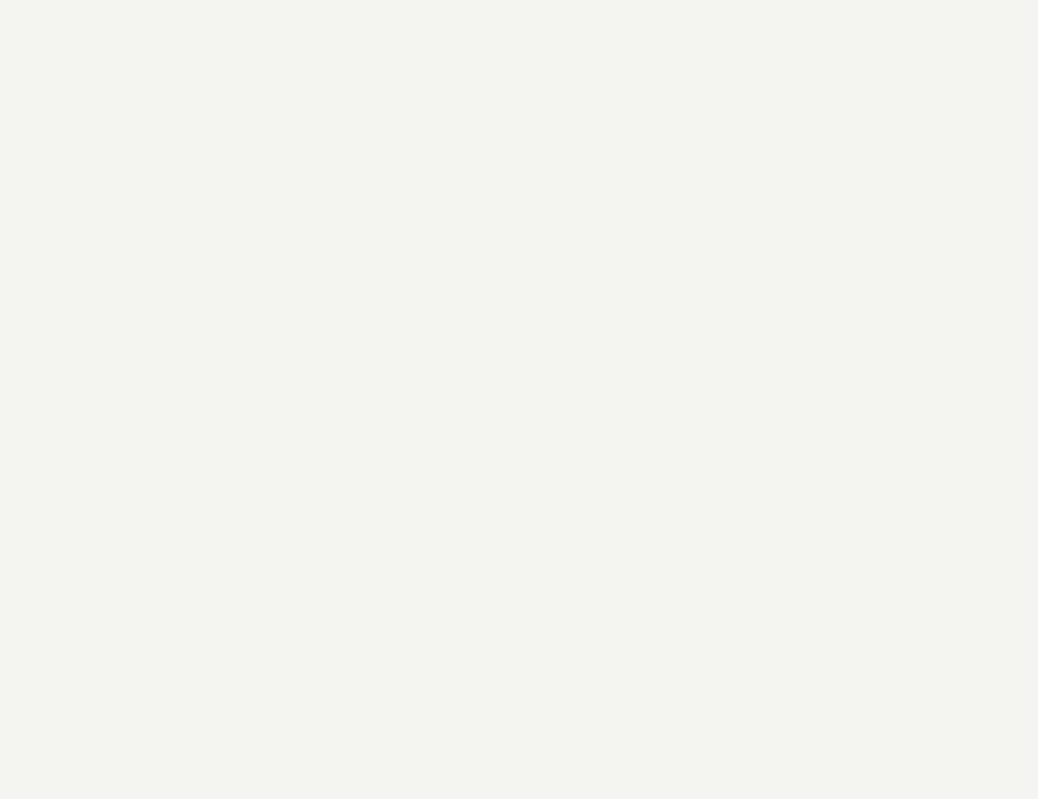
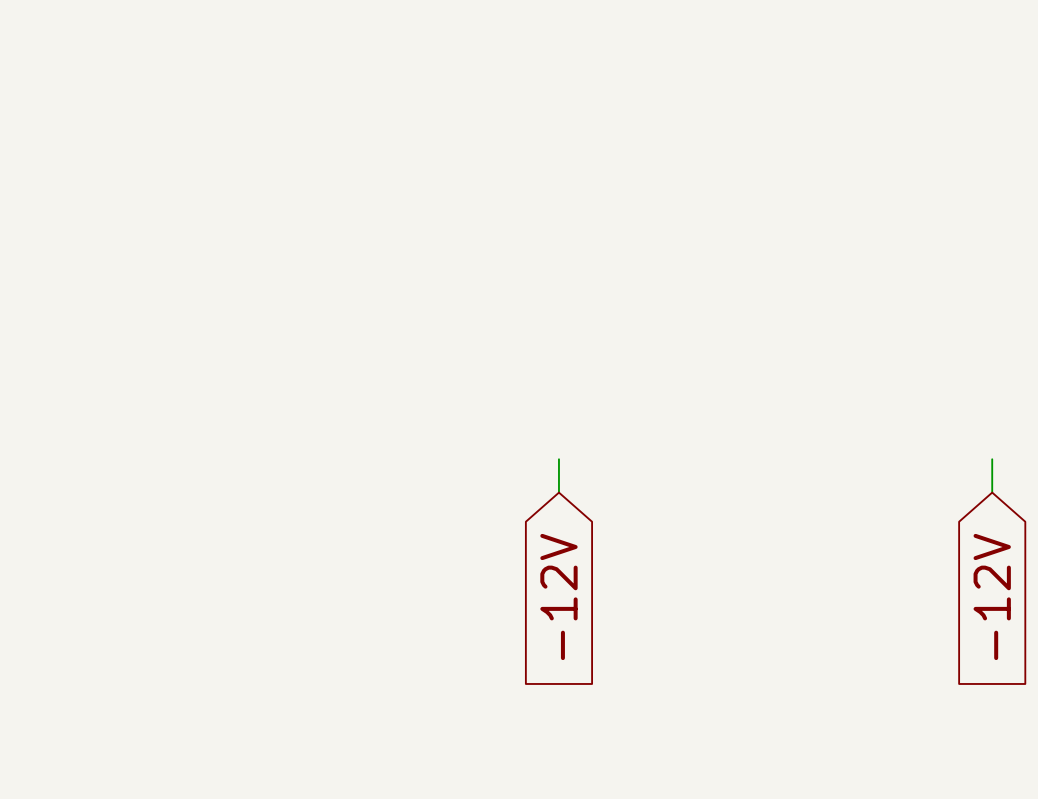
wire: none -> (558, 459) (558, 492)
wire: none -> (992, 459) (992, 492)
global label: none -> -12V (558, 596)
global label: none -> -12V (992, 596)

